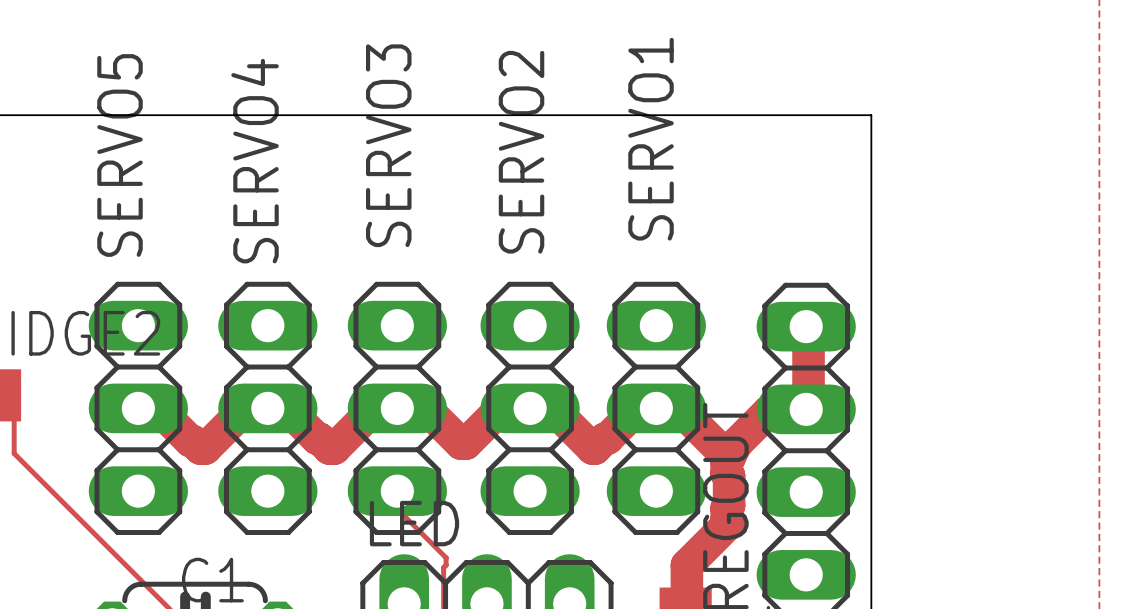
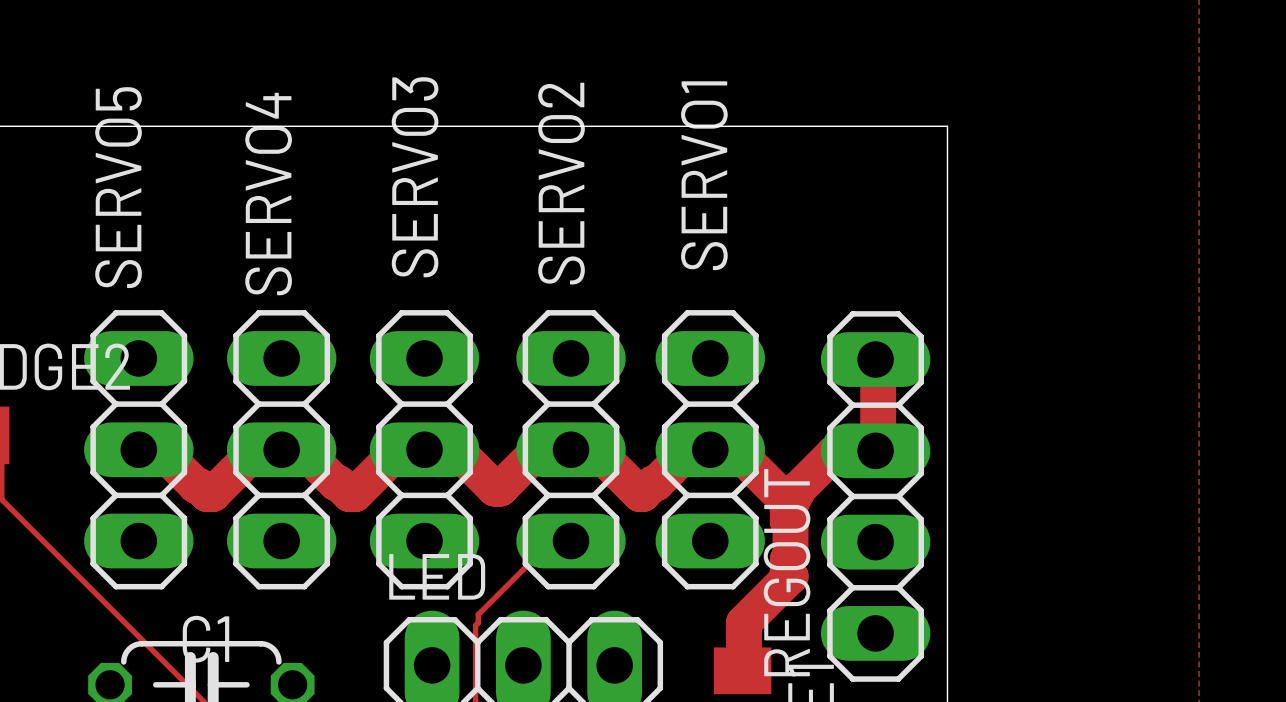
track: (397, 491) (398, 510) (446, 557) -> (571, 541) (568, 543) (549, 543) (478, 614)

